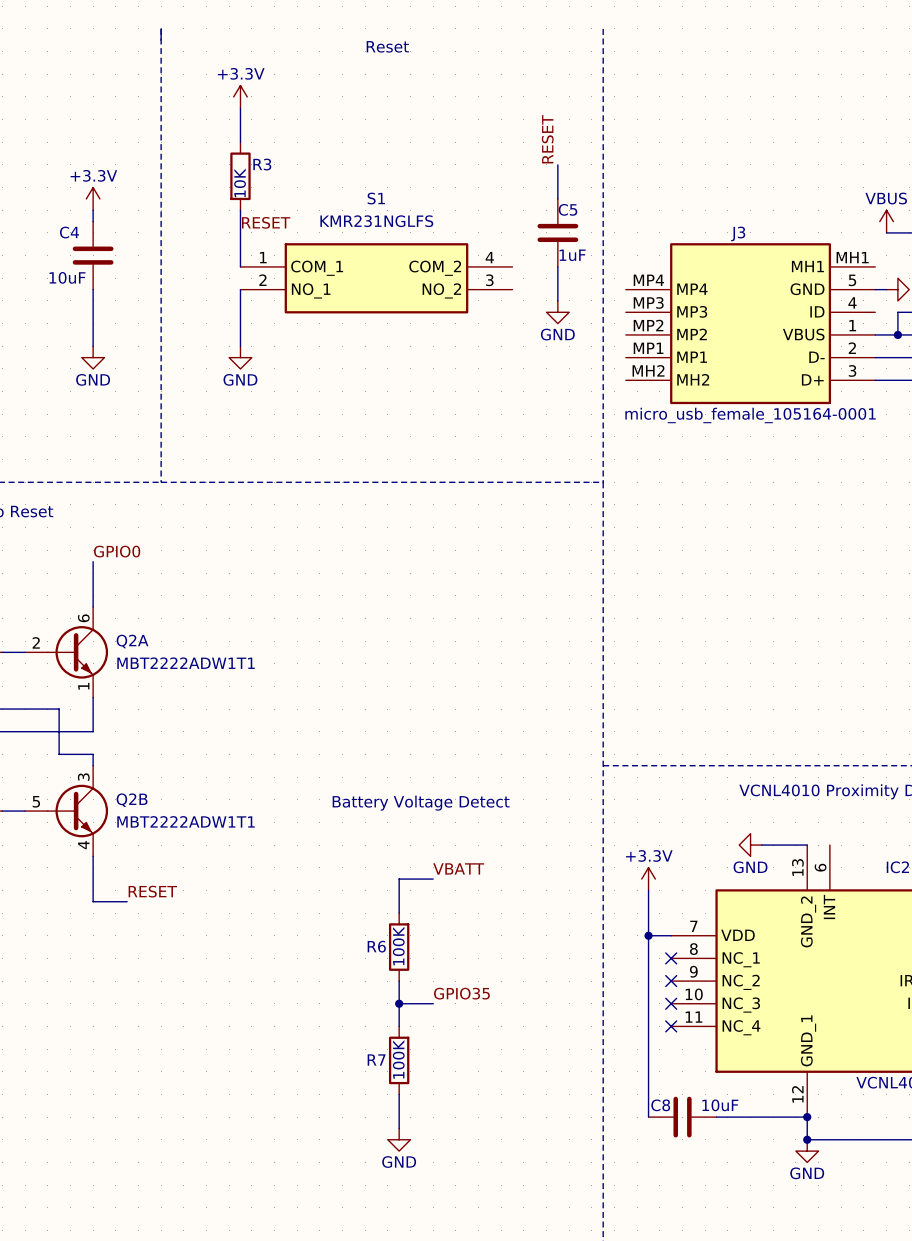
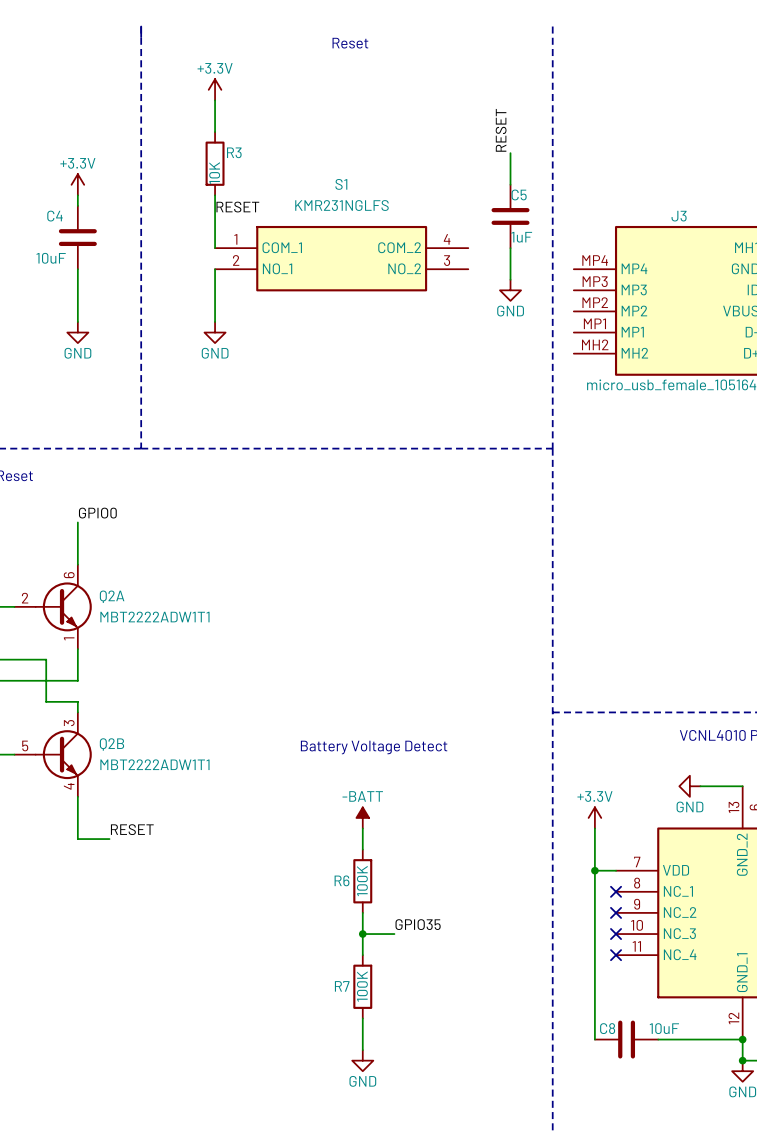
label: VBATT (458, 868) -> none
power symbol: none -> -BATT (362, 817)
wire: (433, 879) (399, 879) (399, 890) -> none

